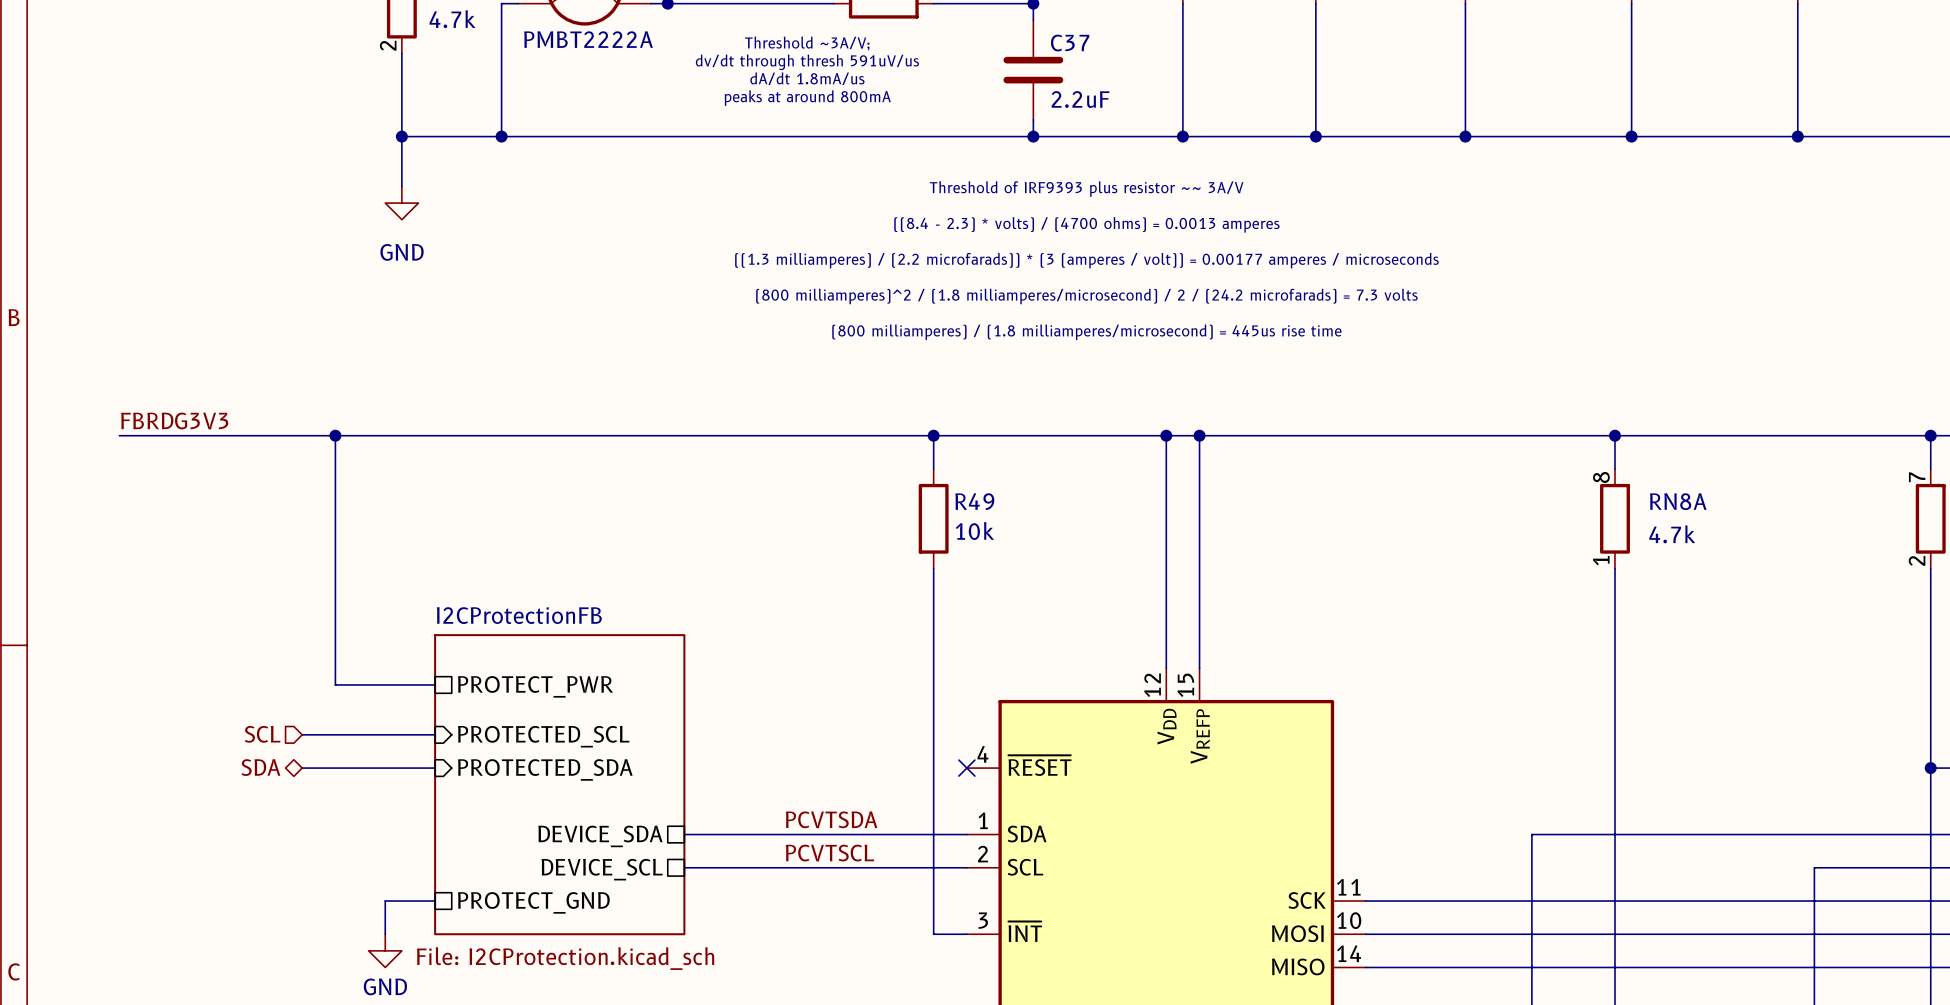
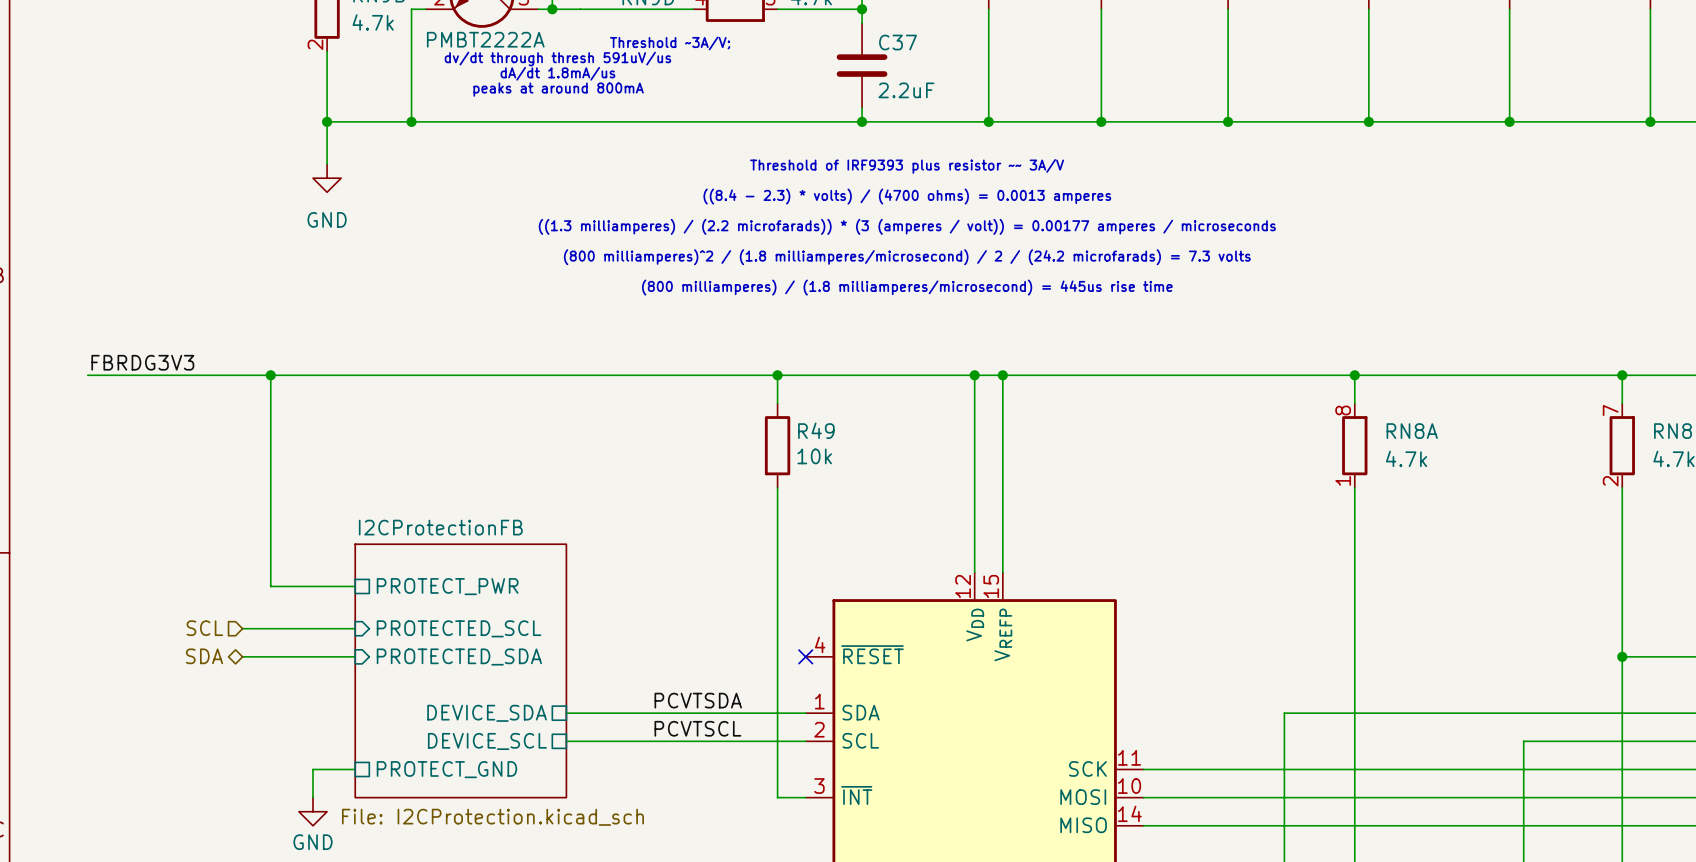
text position: dv/dt through thresh 591uV/us (807, 62) -> dv/dt through thresh 591uV/us (557, 59)
text position: dA/dt 1.8mA/us (807, 78) -> dA/dt 1.8mA/us (557, 73)
text position: peaks at around 800mA (807, 98) -> peaks at around 800mA (558, 89)

